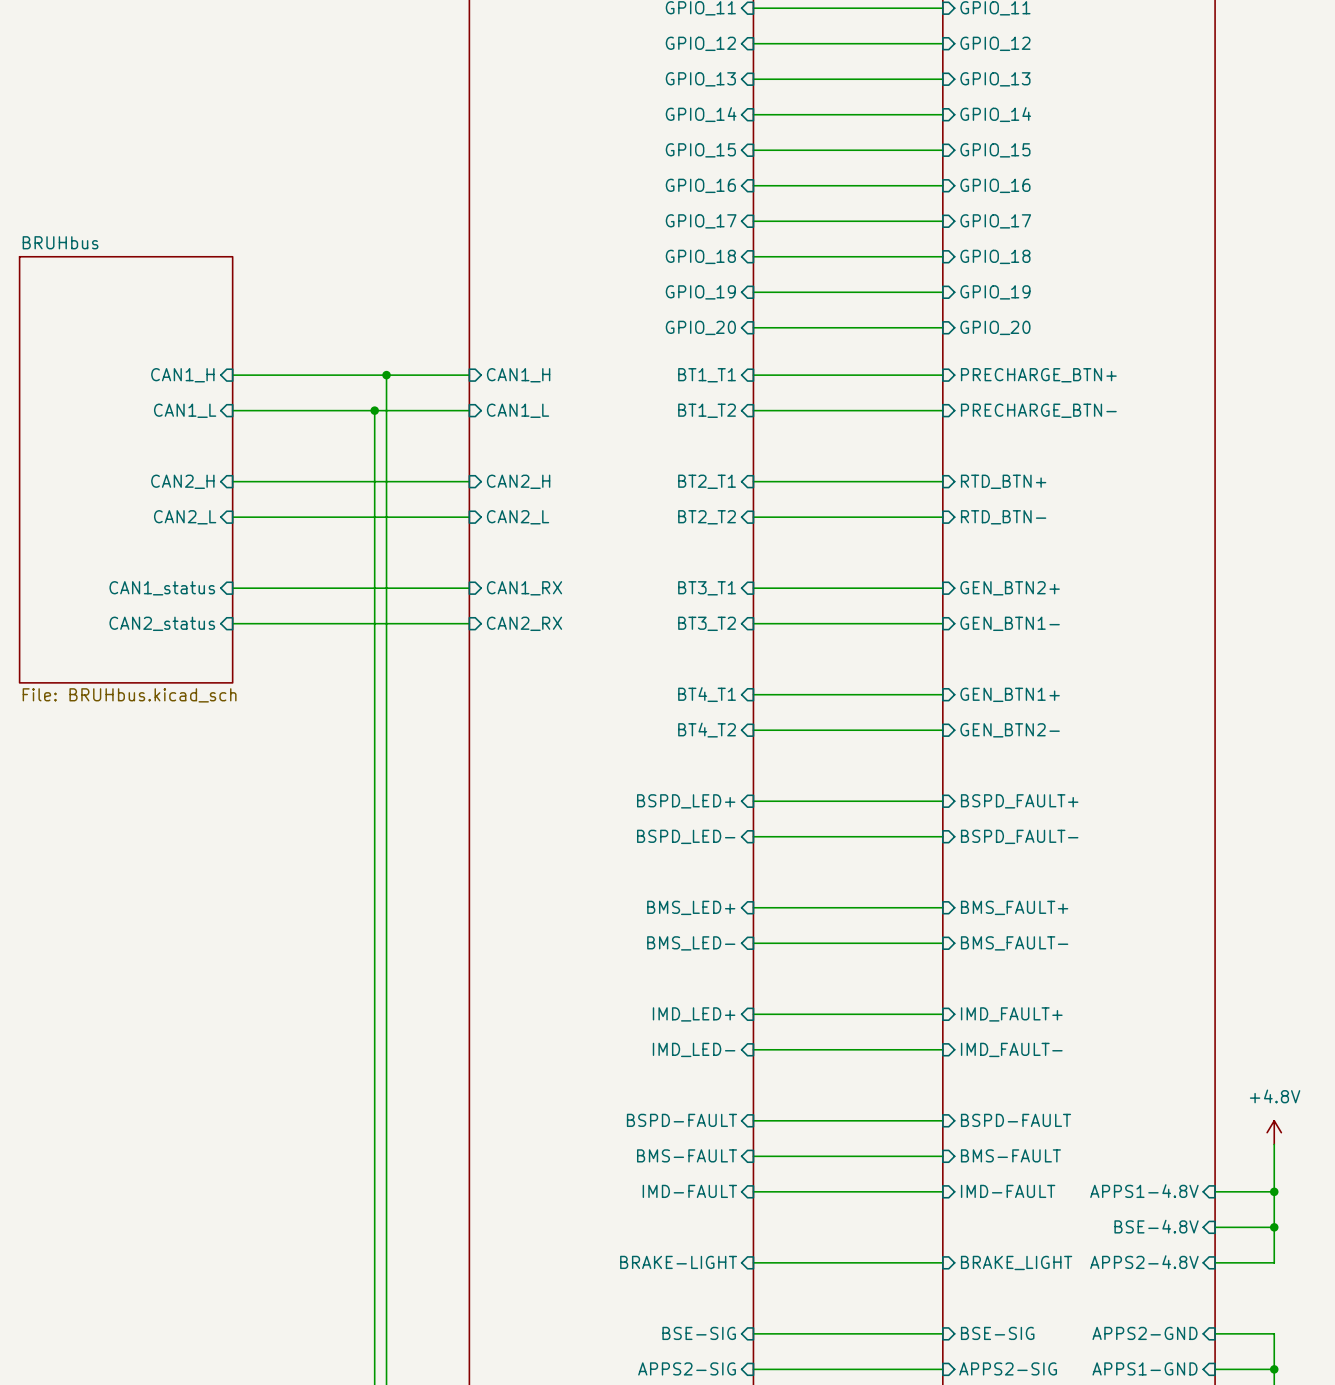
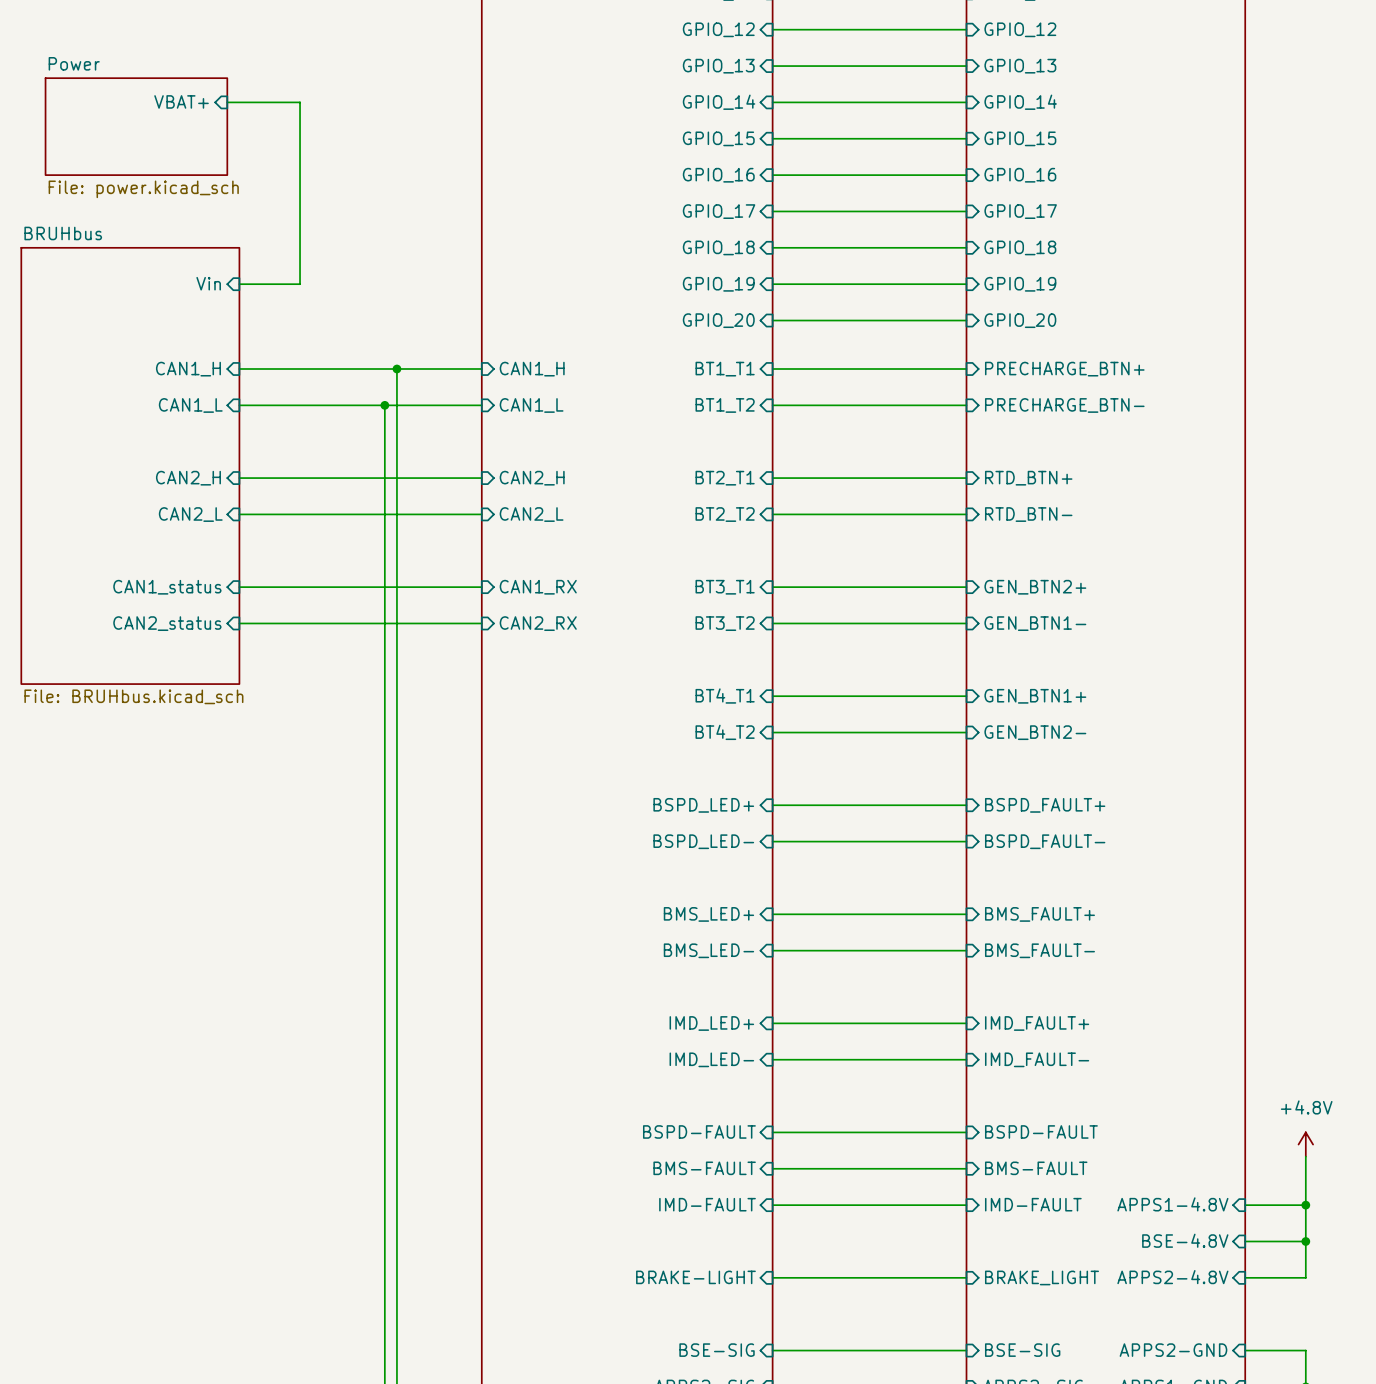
sheet pin: none -> VBAT+ (181, 101)
wire: none -> (227, 102) (300, 102) (300, 284) (239, 284)
sheet Power: none -> File: power.kicad_sch (136, 126)
sheet pin: none -> Vin (208, 283)

